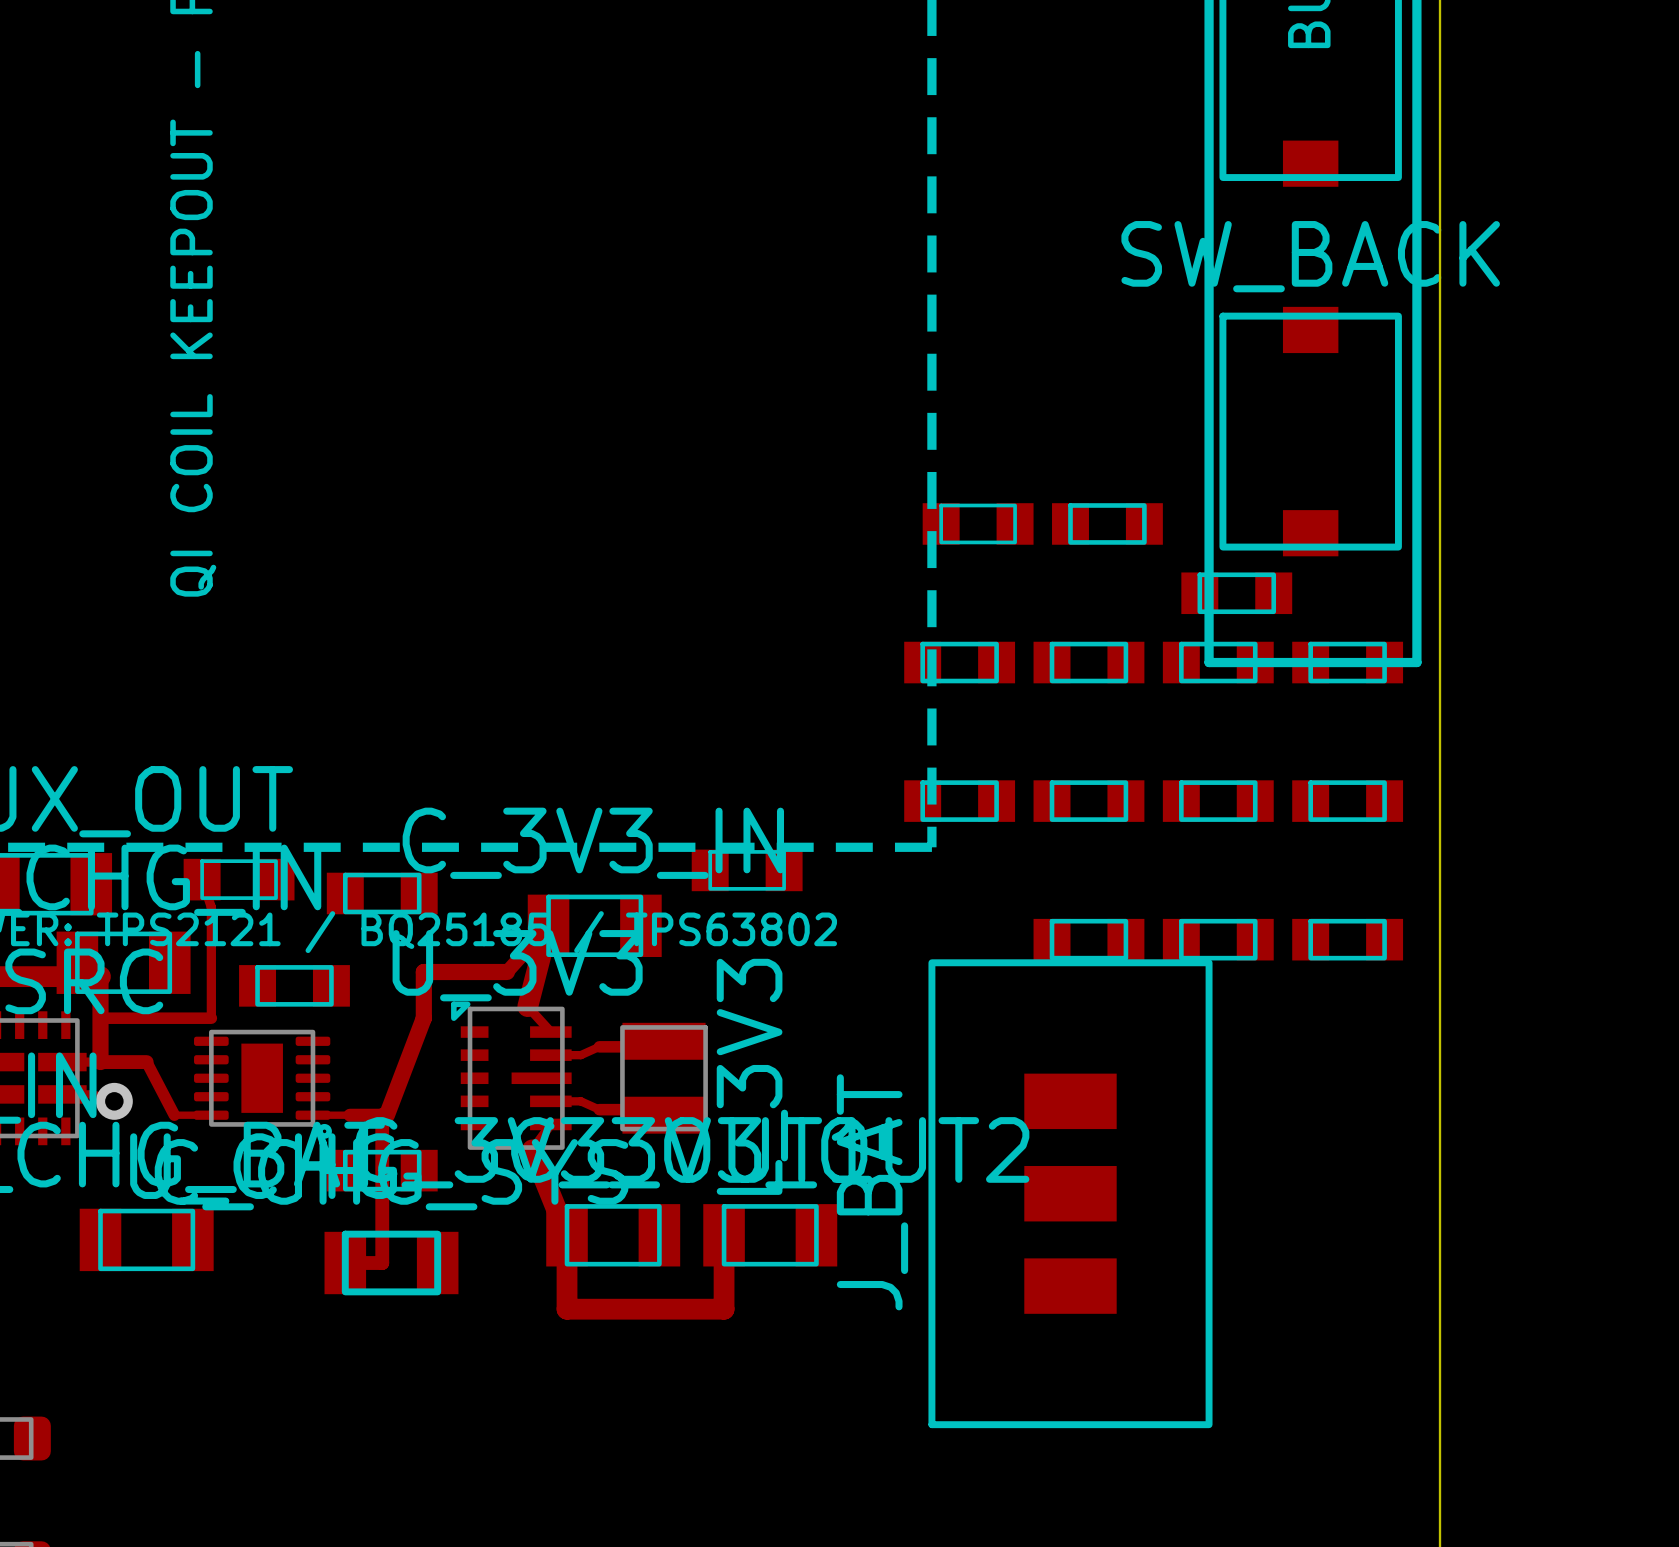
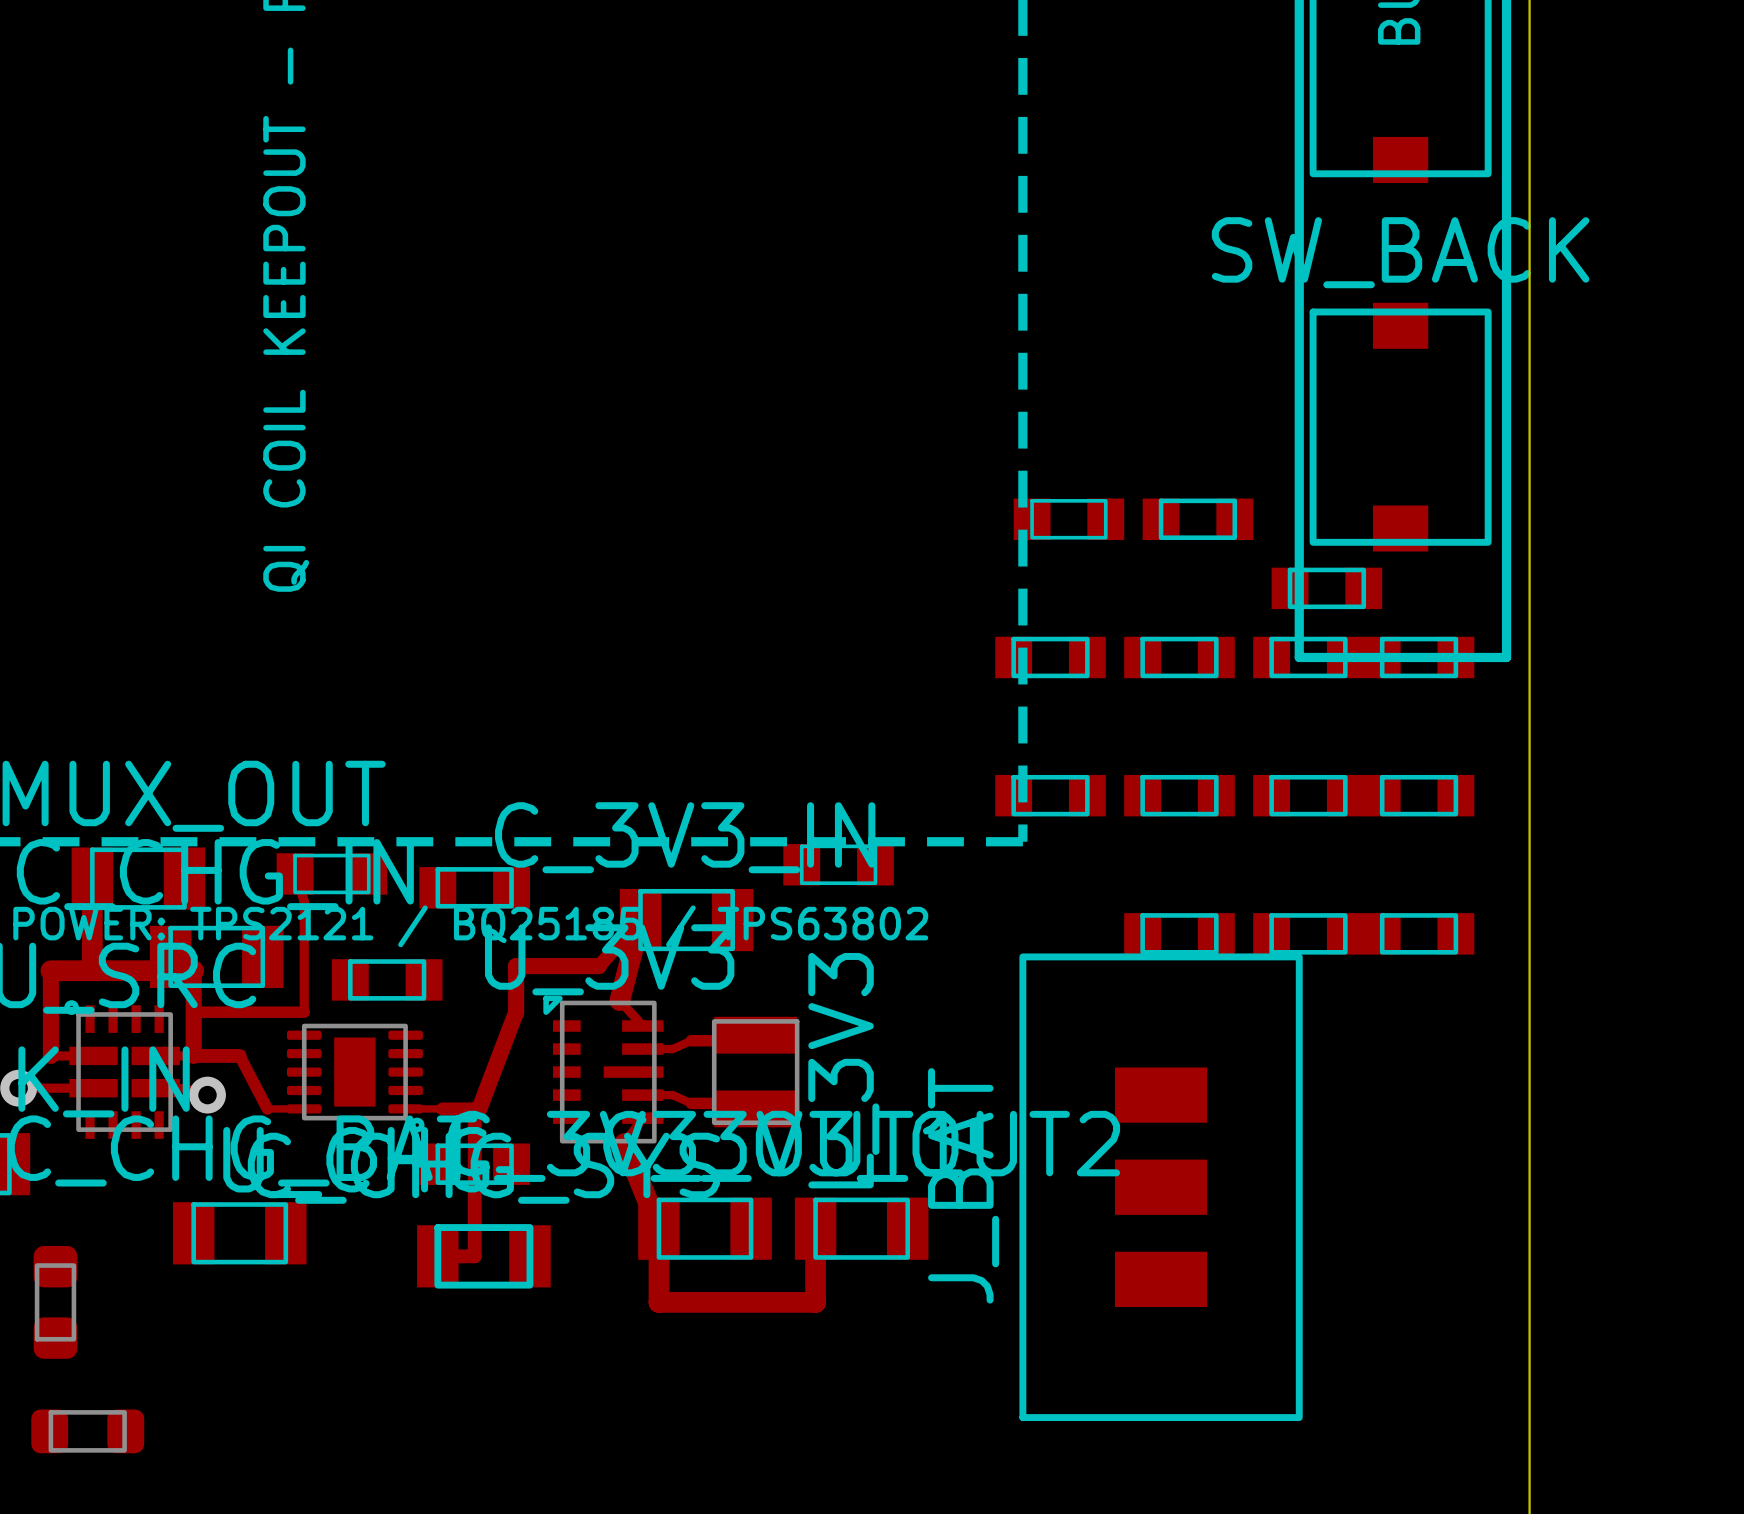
part position: (1347, 662) -> (1419, 657)
part position: (1347, 801) -> (1419, 795)
part position: (1347, 939) -> (1419, 933)

